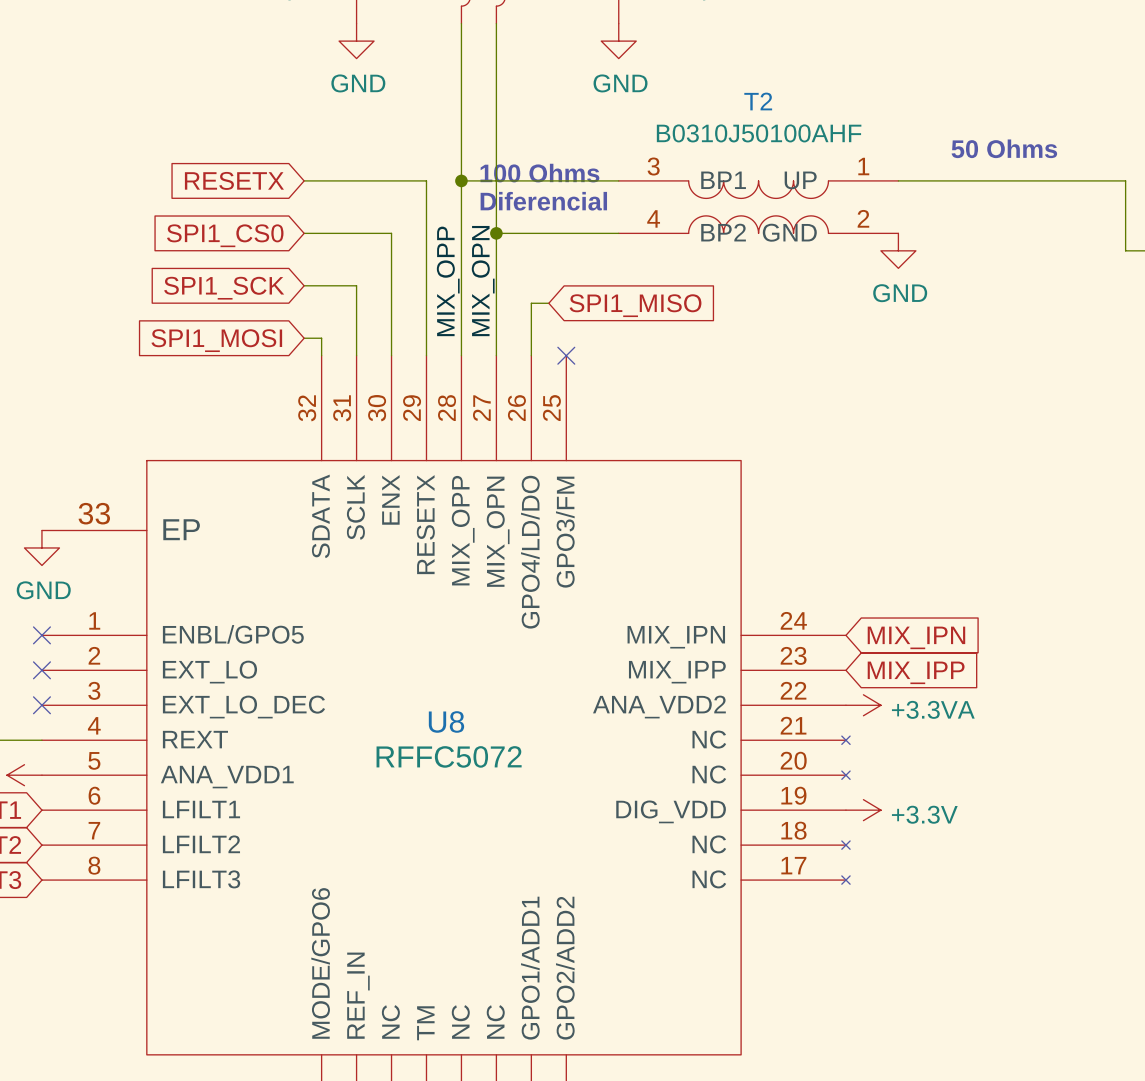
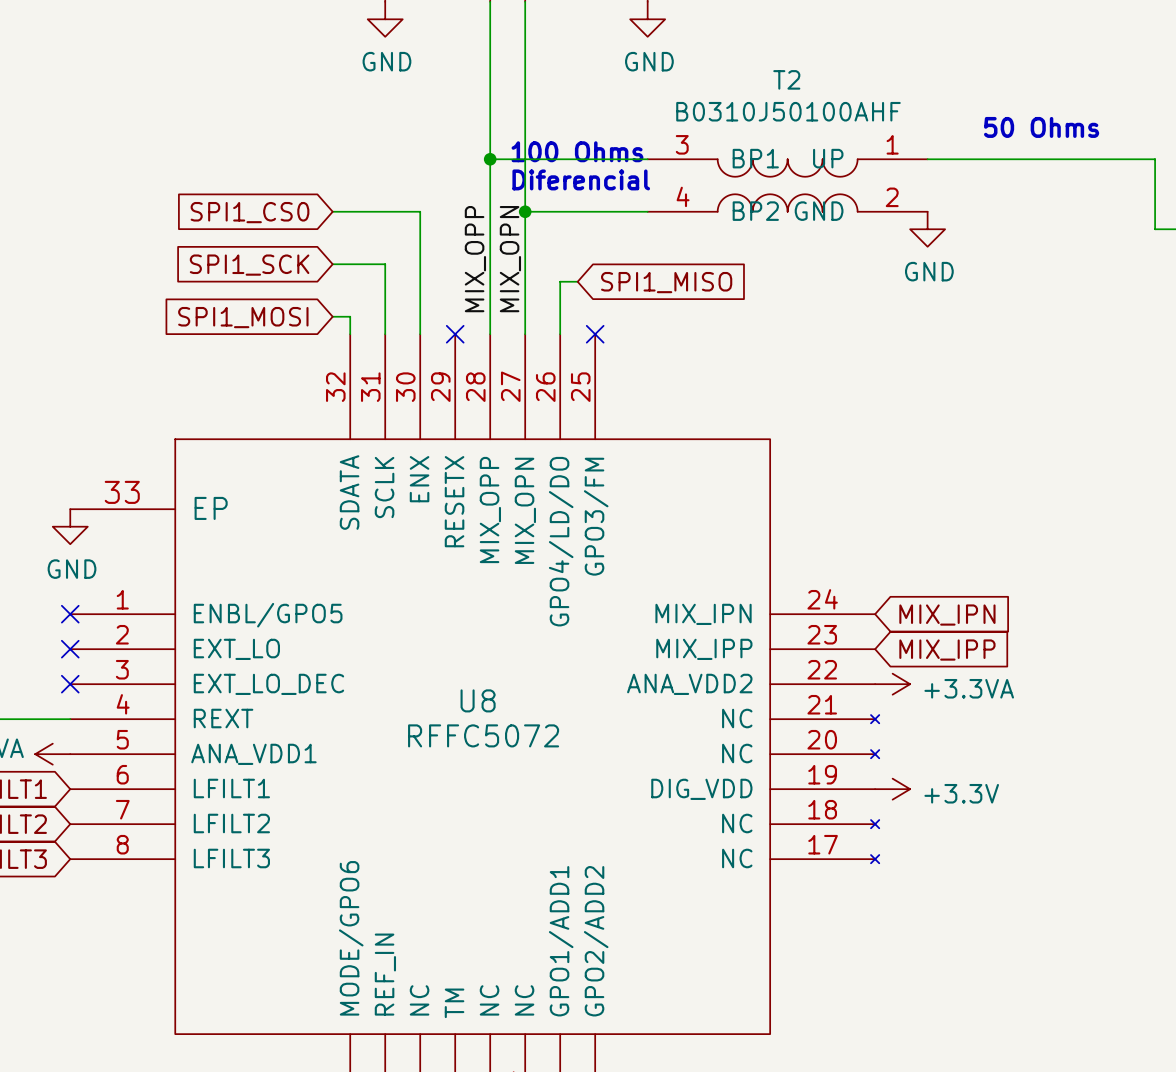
global label: RESETX (234, 180) -> none
wire: (304, 180) (426, 180) (426, 355) -> none
no-connect mark: none -> (455, 334)

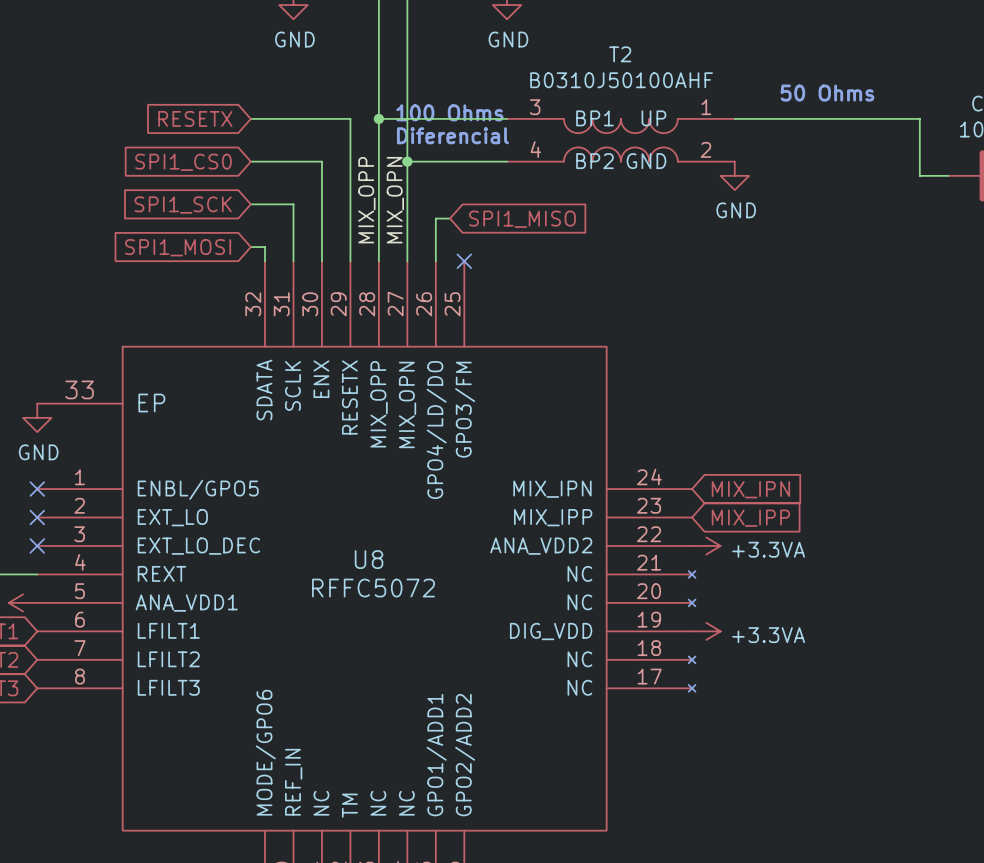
global label: none -> RESETX (195, 118)
wire: none -> (250, 118) (350, 118) (350, 261)
no-connect mark: (455, 334) -> none
power symbol: +3.3V (892, 789) -> +3.3VA (706, 631)

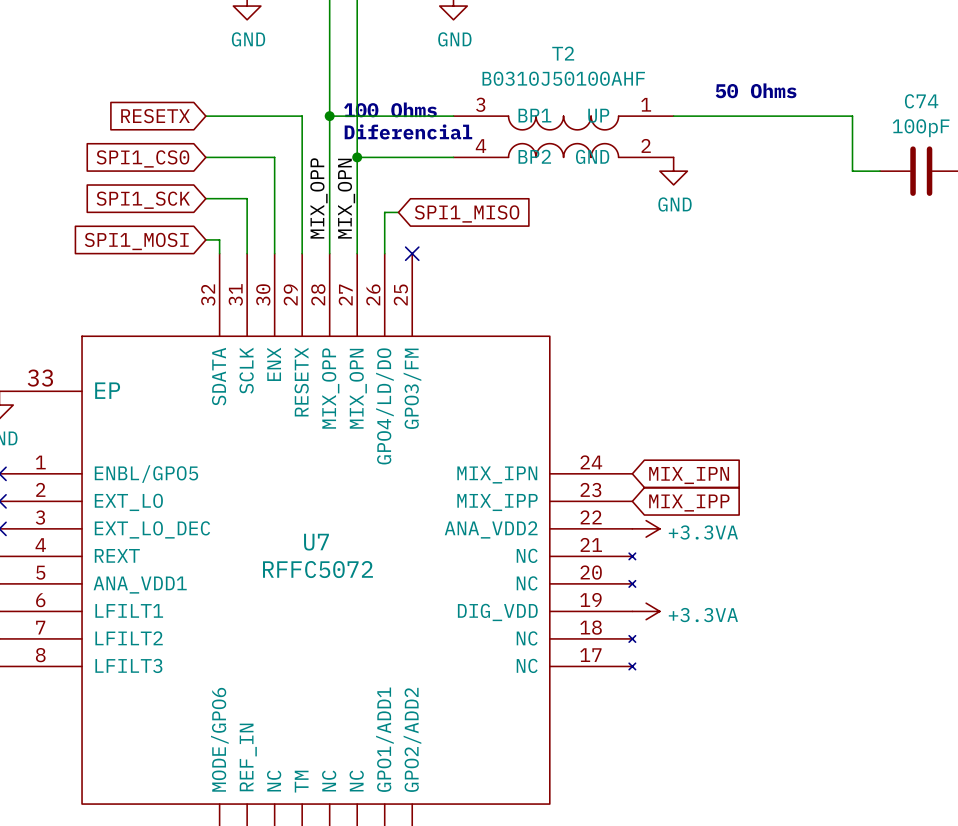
U8 name: U8 (369, 559) -> U7 (316, 542)

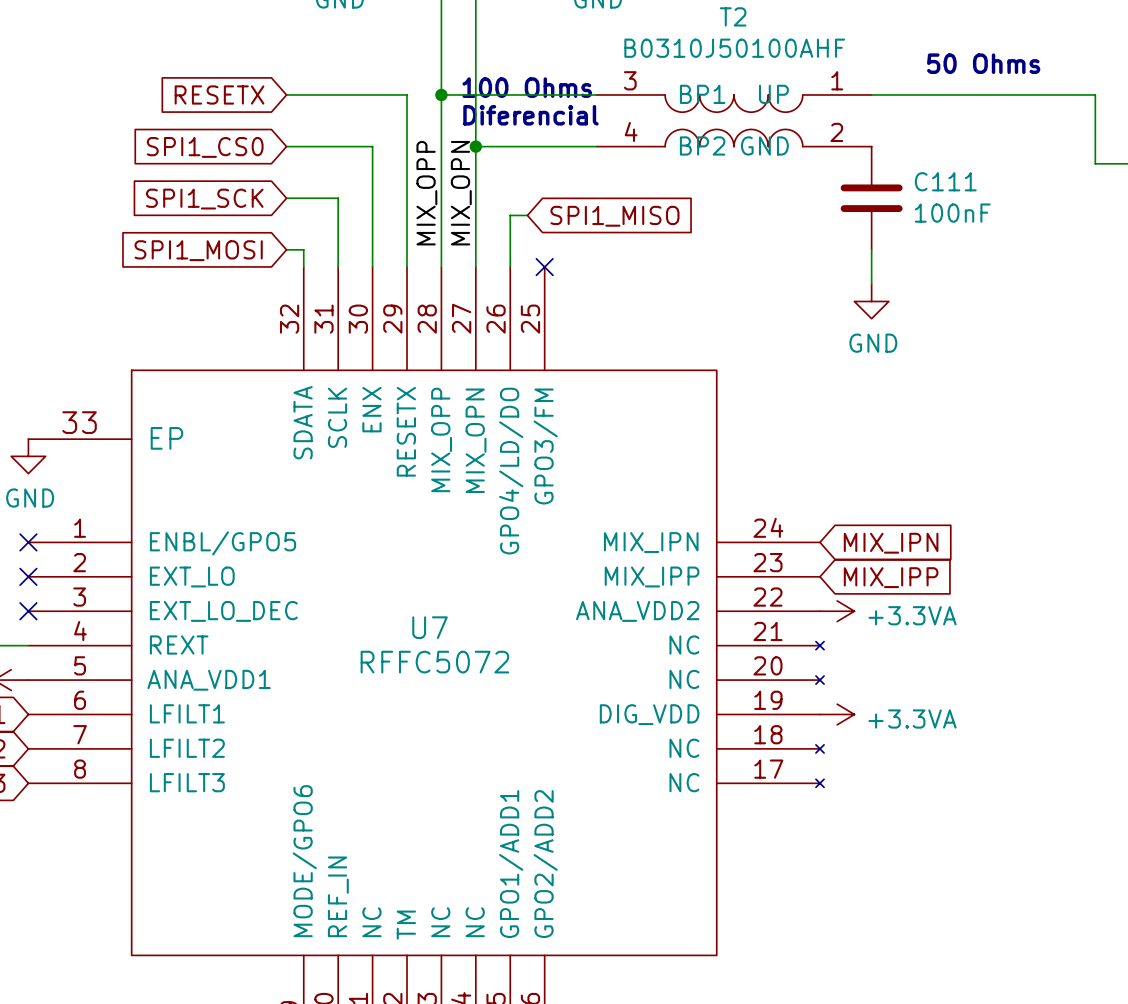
power symbol position: GND (673, 171) -> GND (871, 301)
C111: none -> 100nF (871, 198)
wire: none -> (871, 249) (871, 284)

